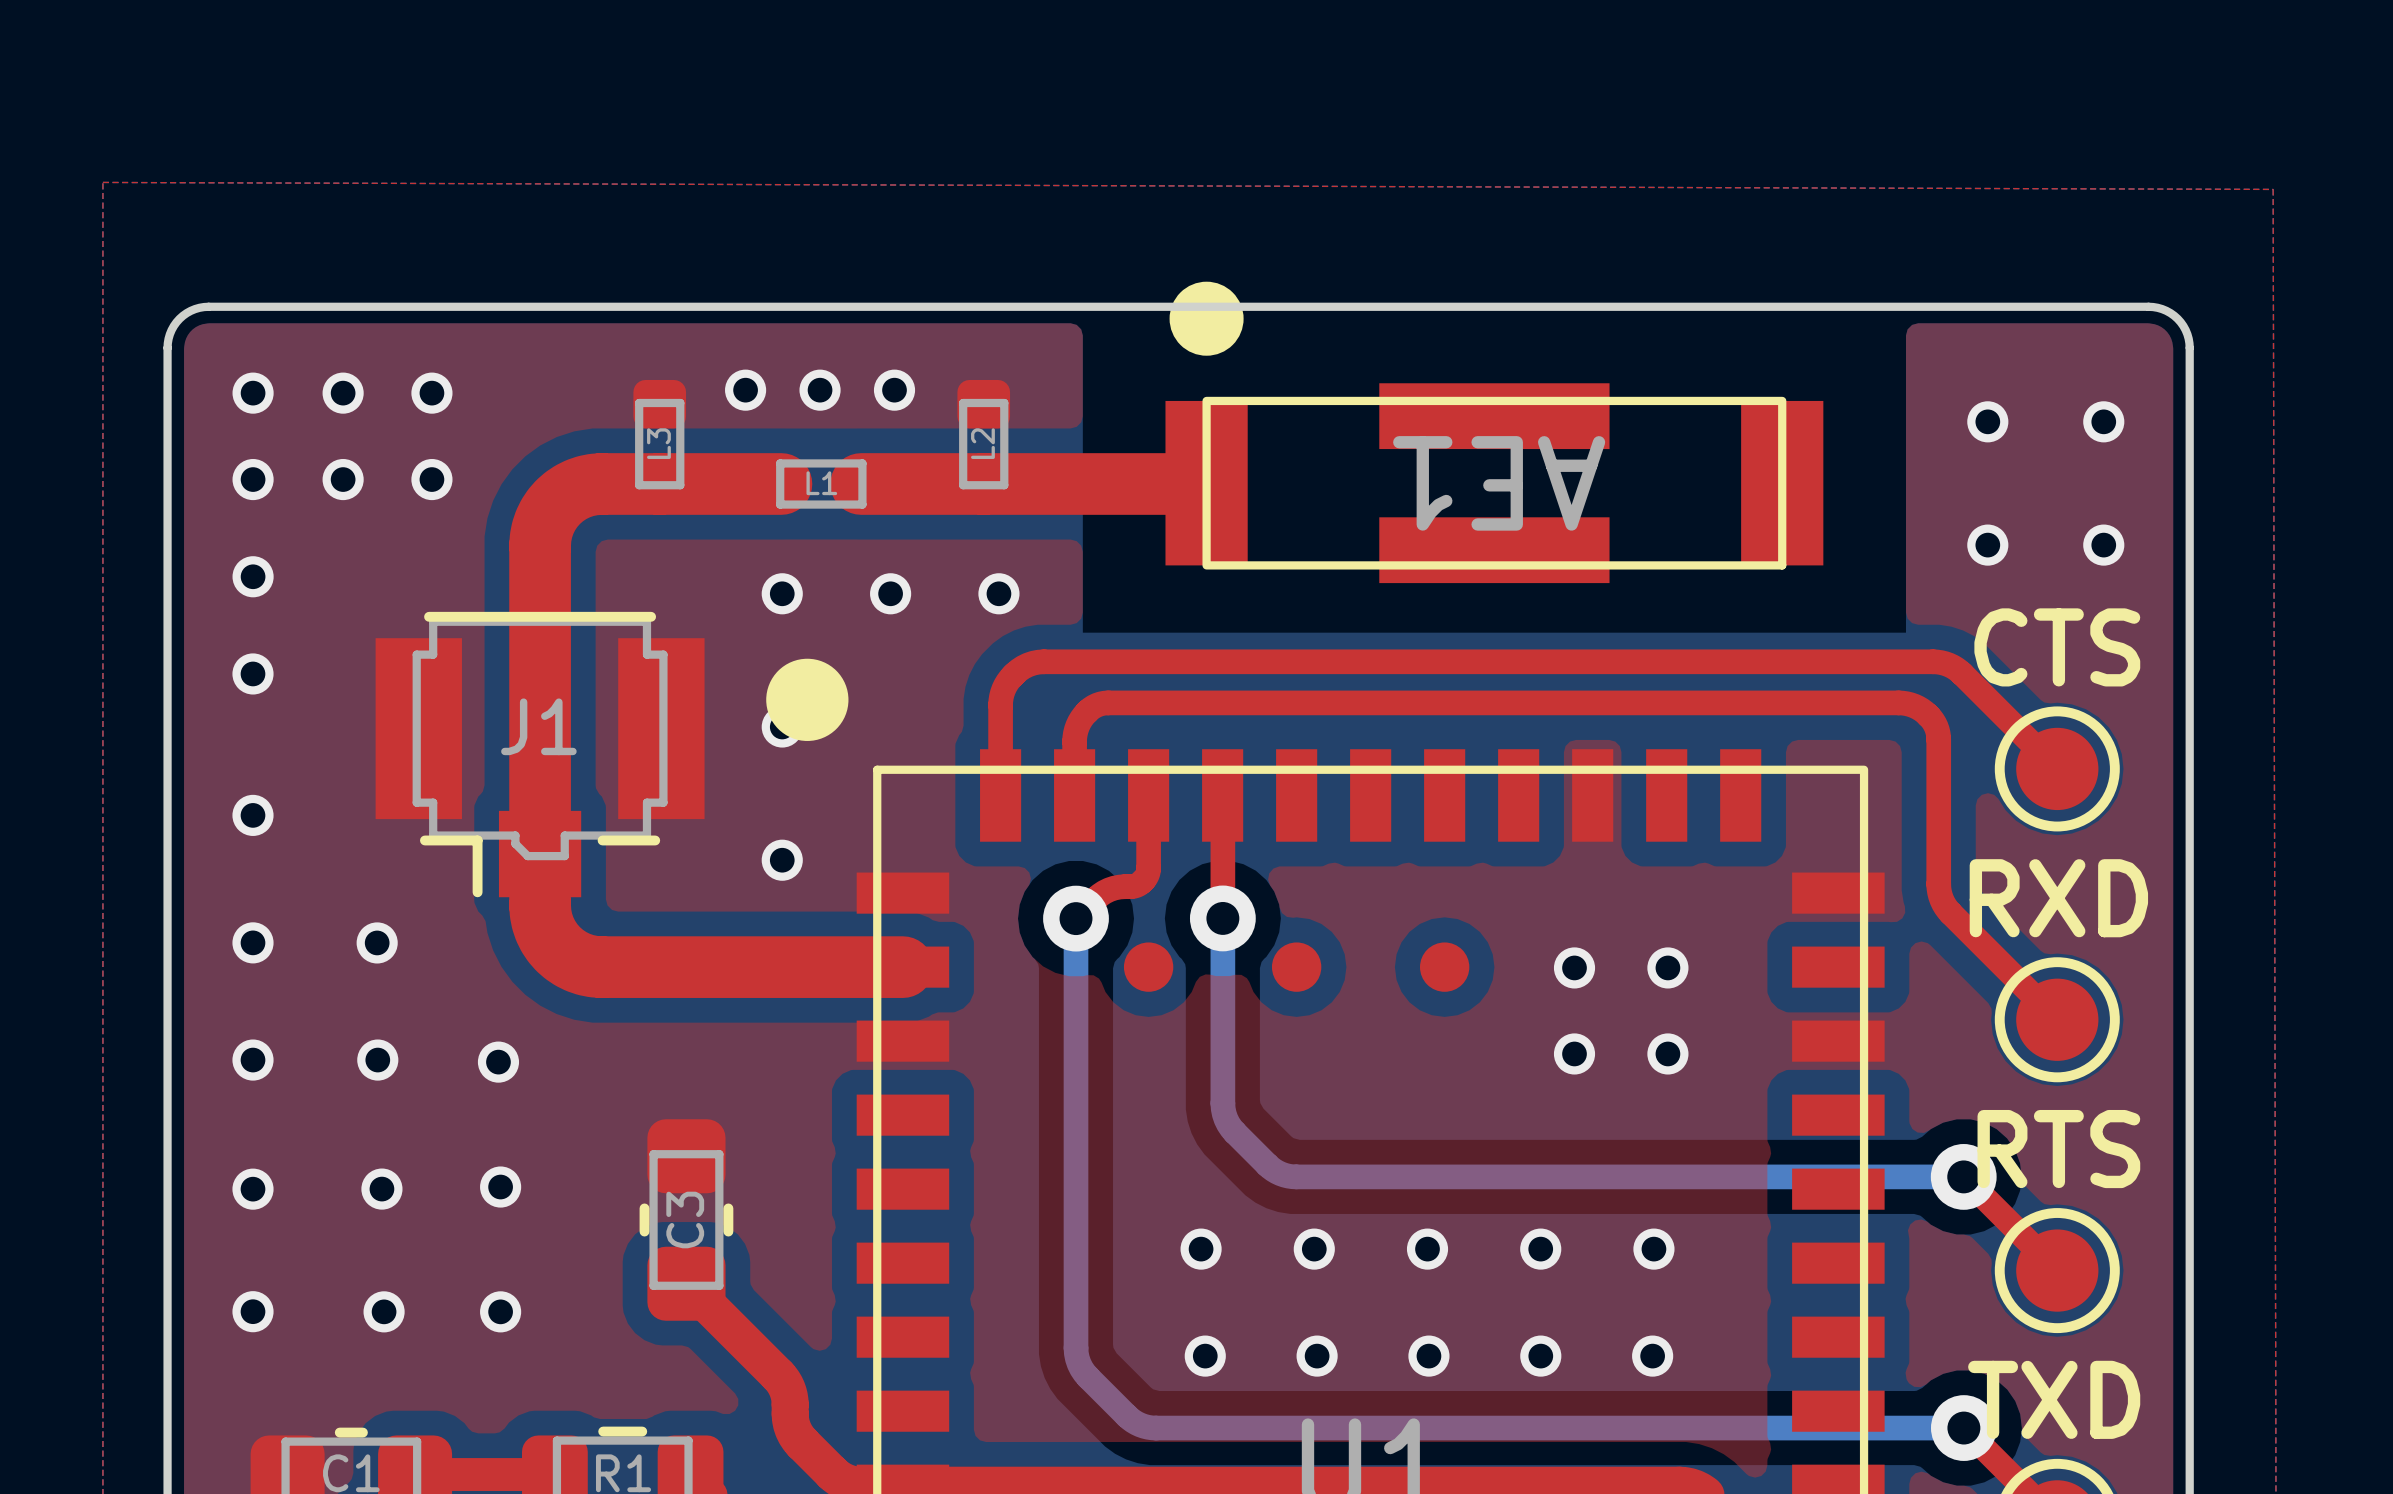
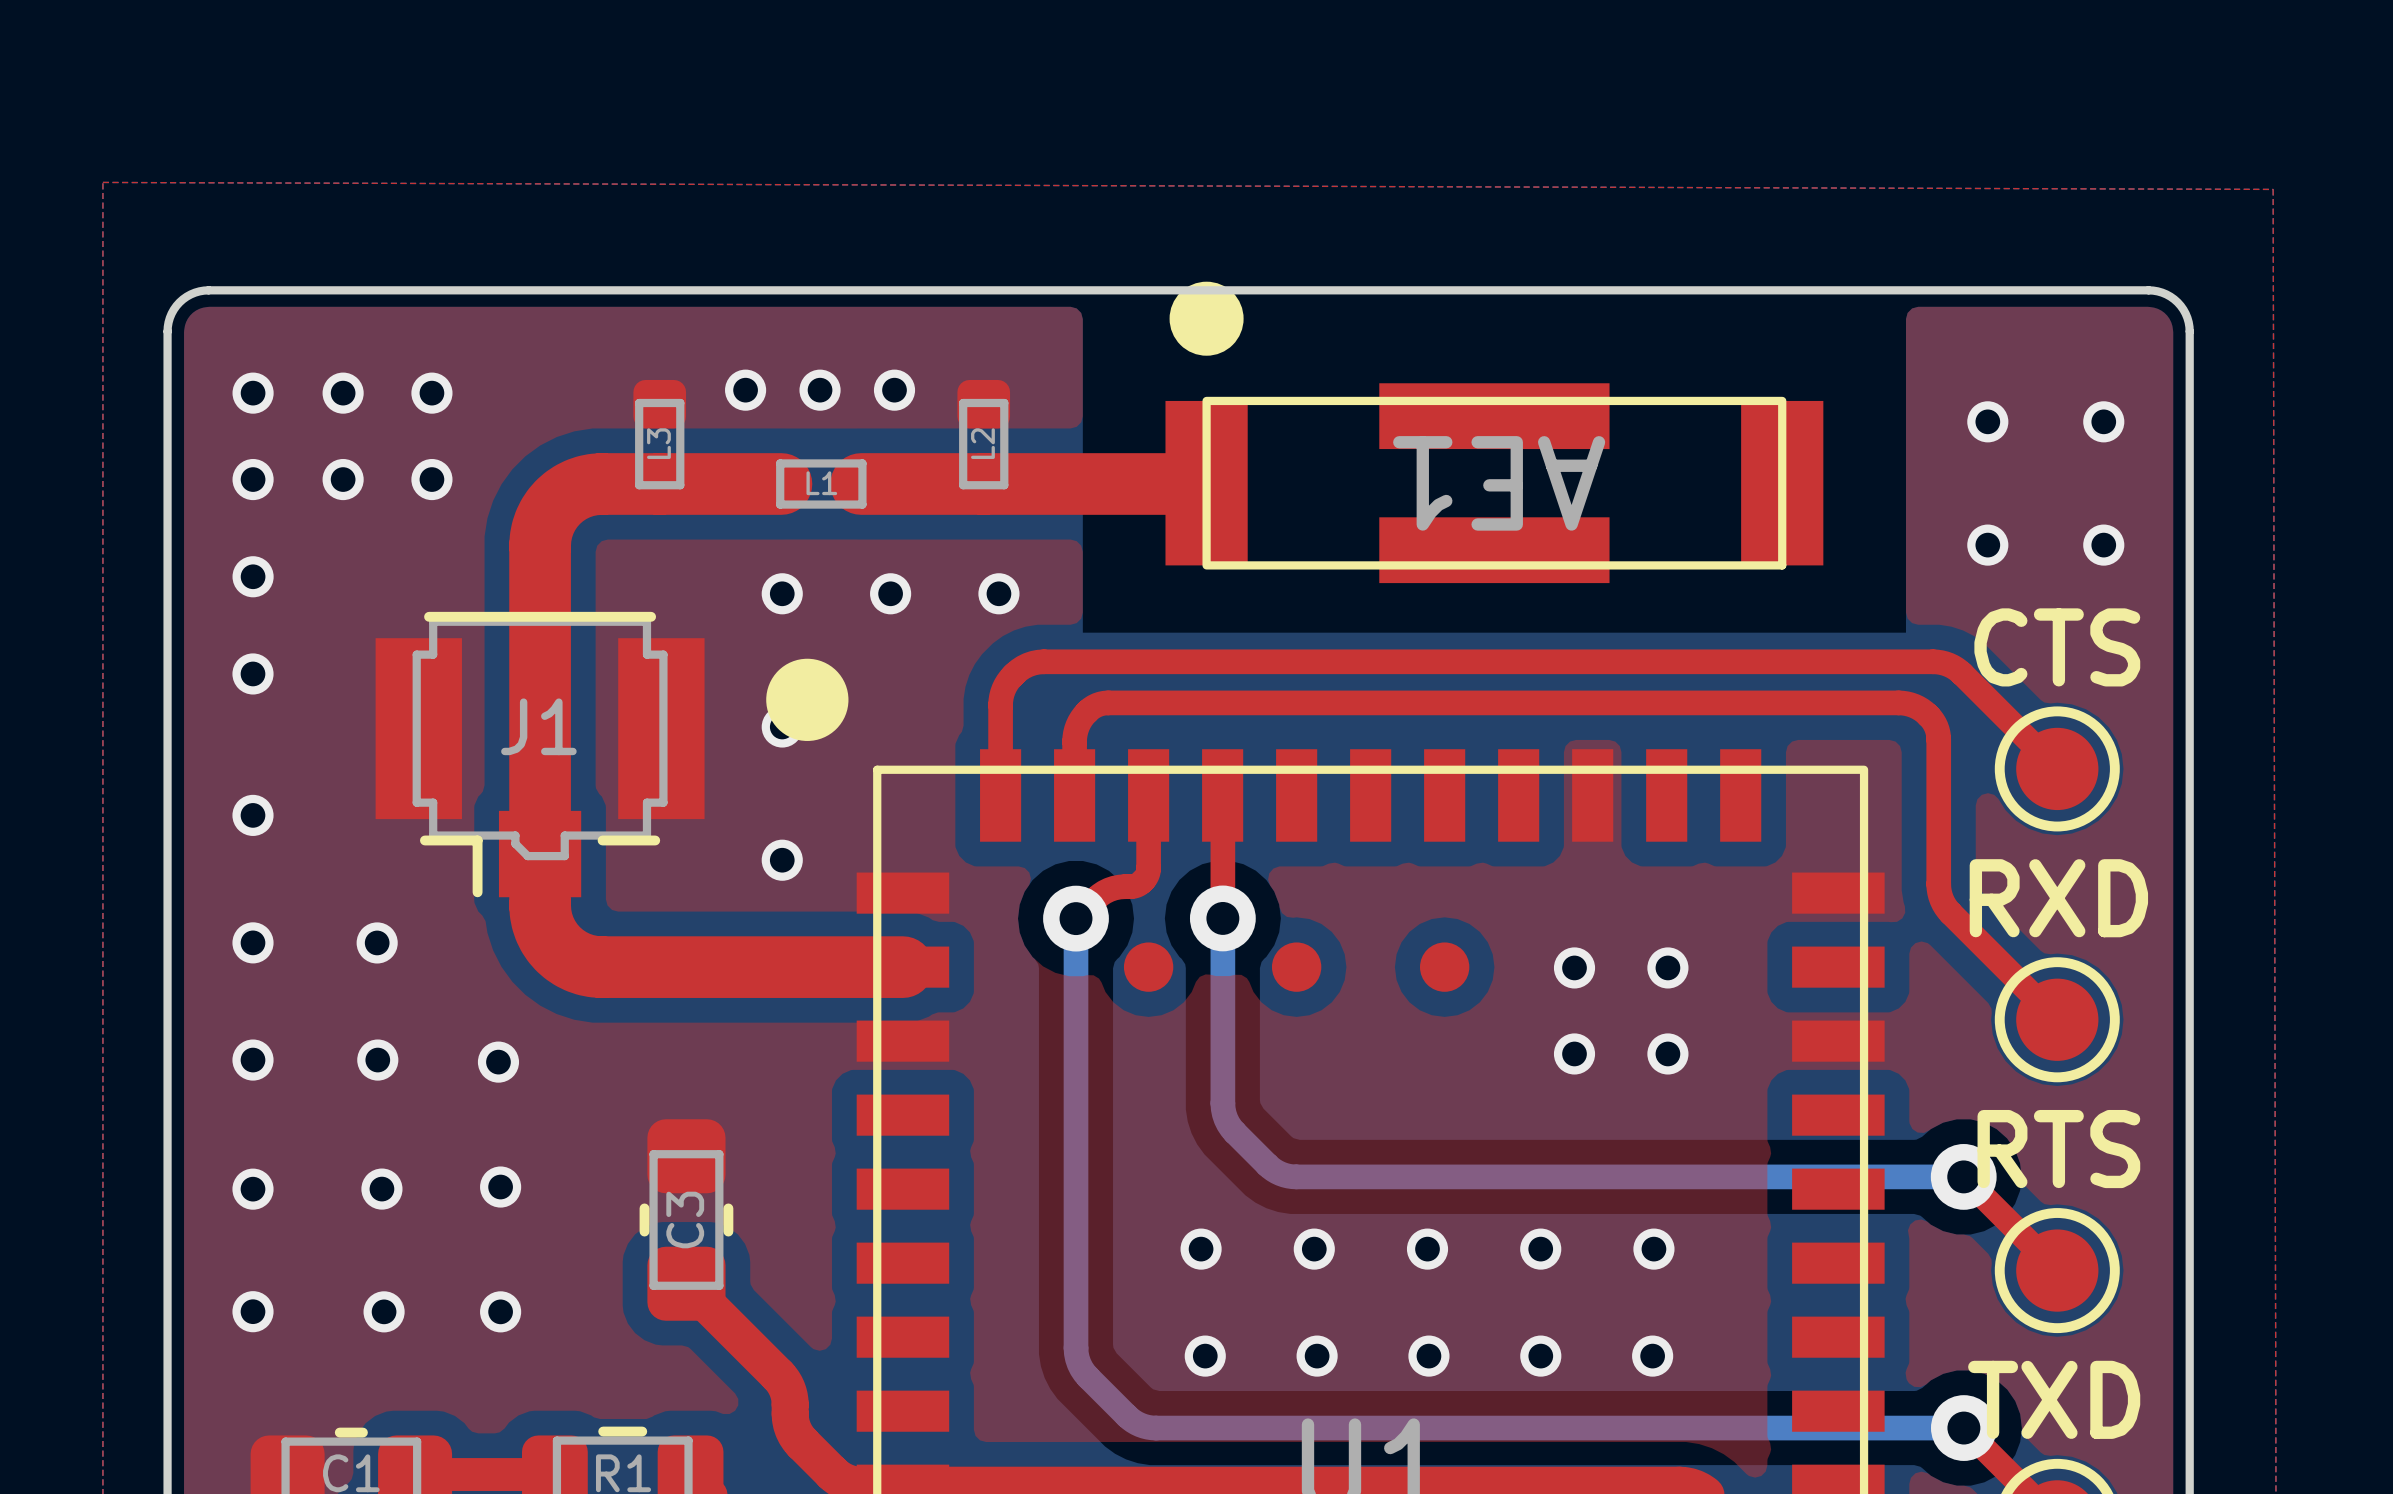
board edge: (167, 347) (169, 334) (179, 318) (195, 309) (208, 306) (2148, 306) (2162, 309) (2177, 318) (2185, 330) (2189, 347) -> (167, 347) (168, 322) (176, 305) (190, 294) (208, 290) (2148, 290) (2166, 294) (2180, 305) (2188, 322) (2189, 347)

